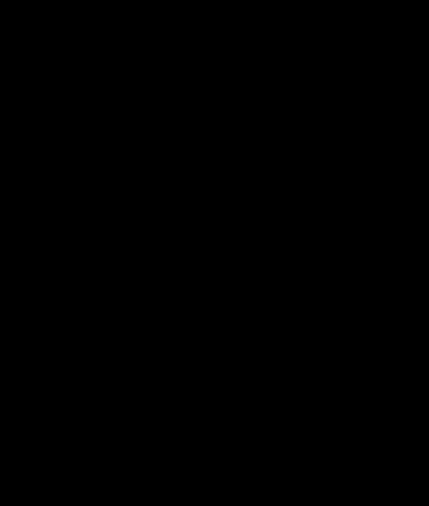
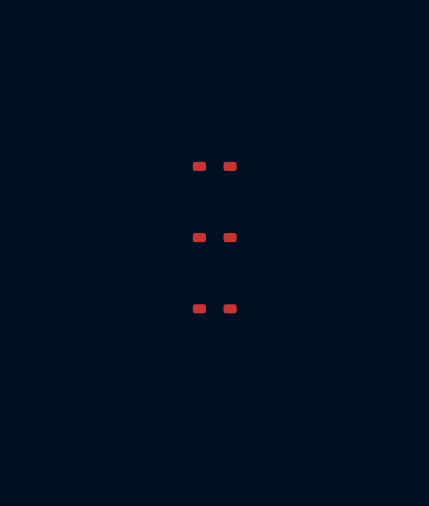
part: none -> (214, 166)
part: none -> (214, 237)
part: none -> (214, 308)

